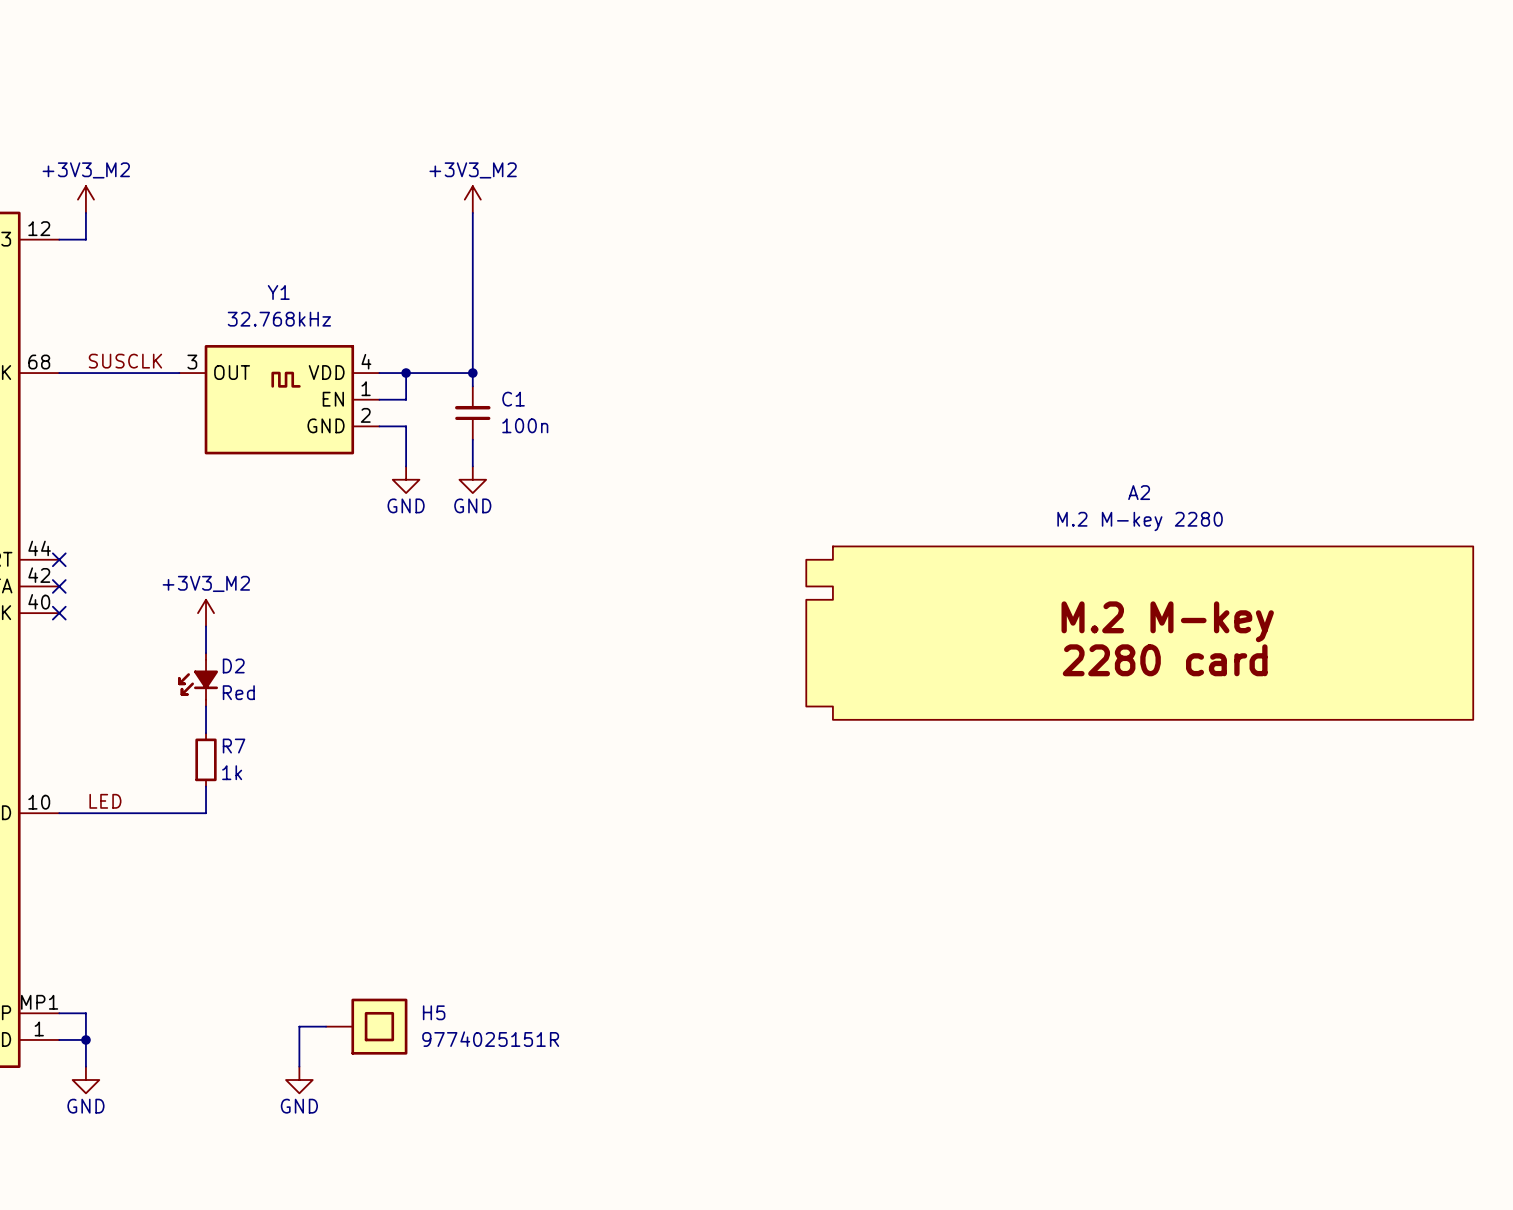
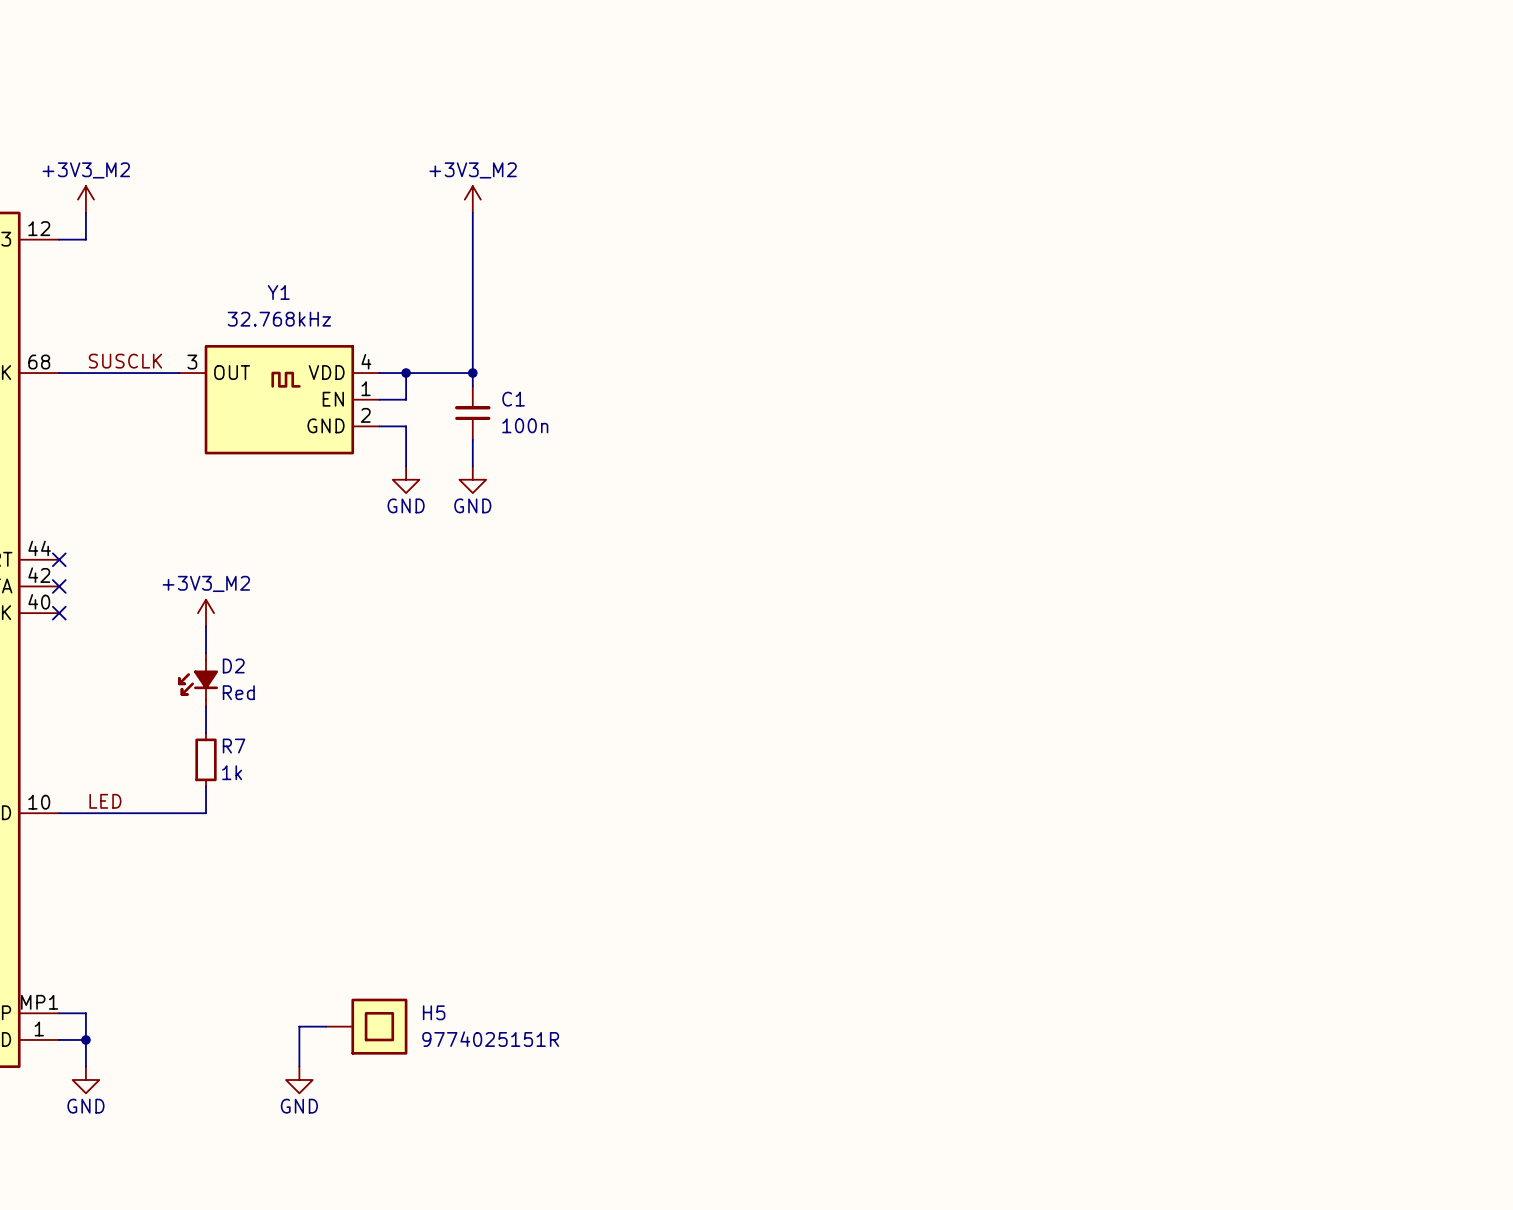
A2: M.2 M-key 2280 (1139, 633) -> none

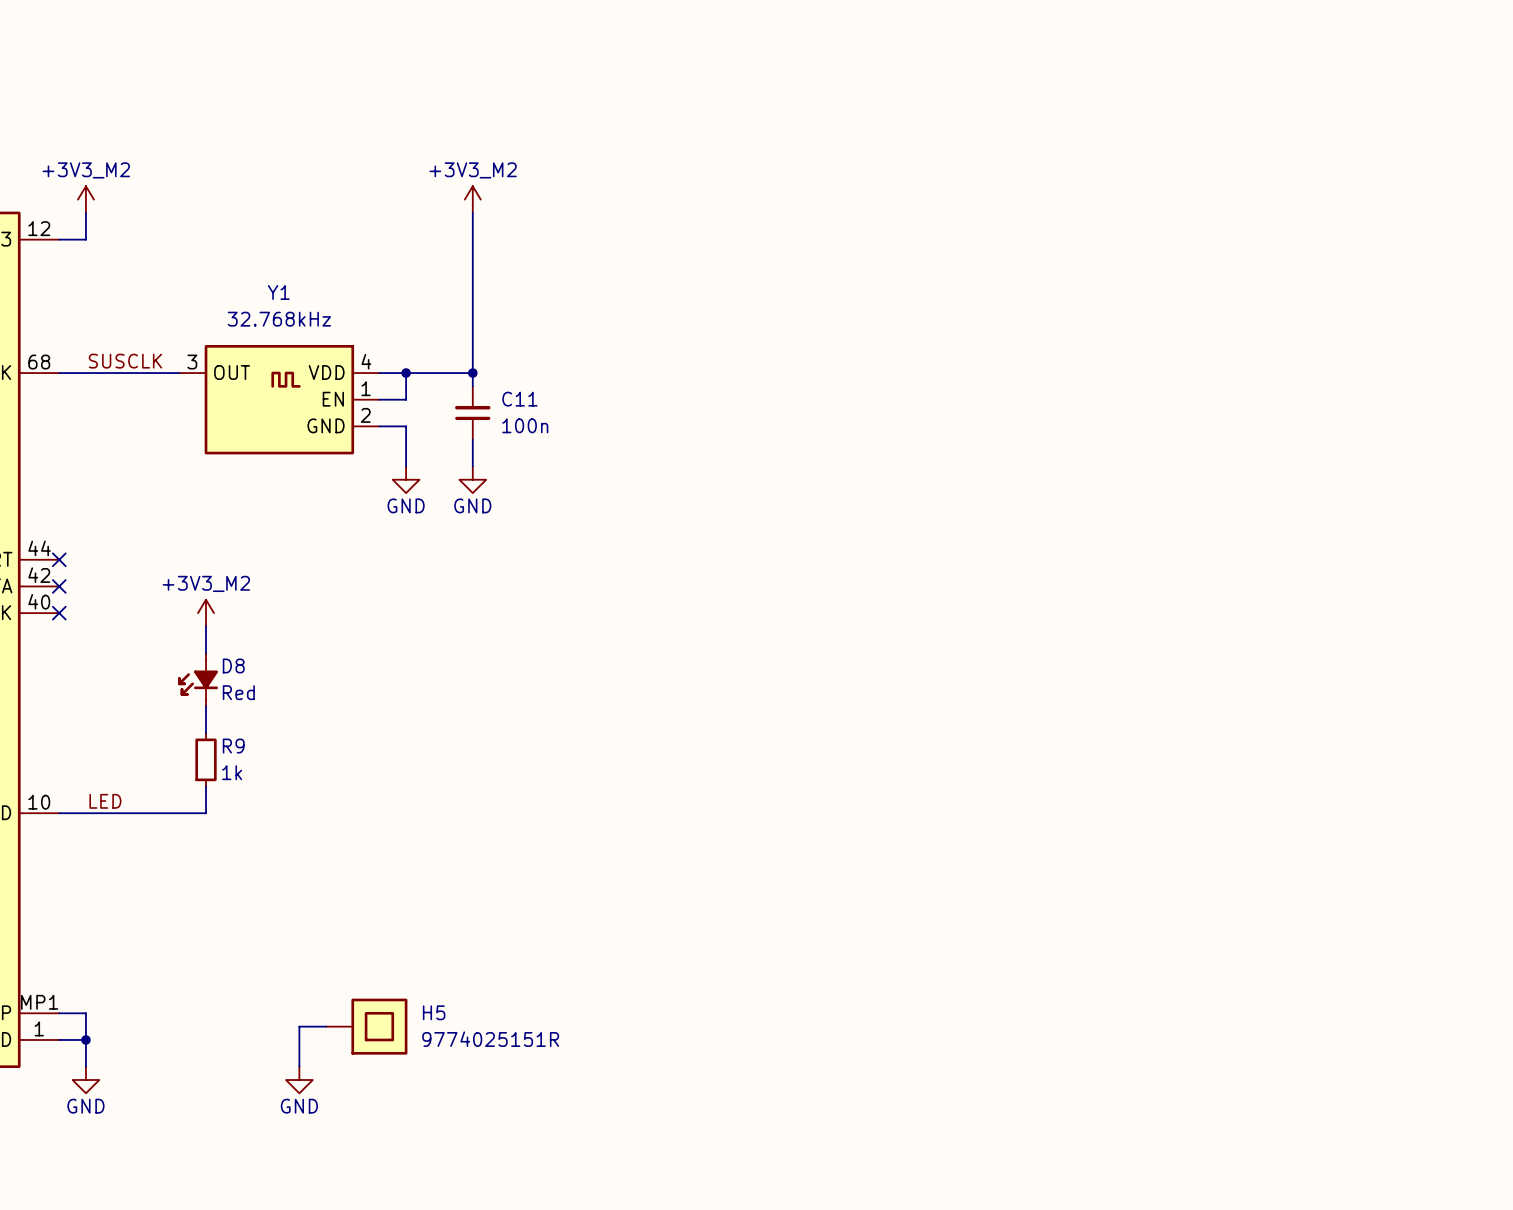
C1 name: C1 (513, 399) -> C11 (519, 399)
D2 name: D2 (233, 665) -> D8 (233, 665)
R7 name: R7 (234, 746) -> R9 (233, 746)

